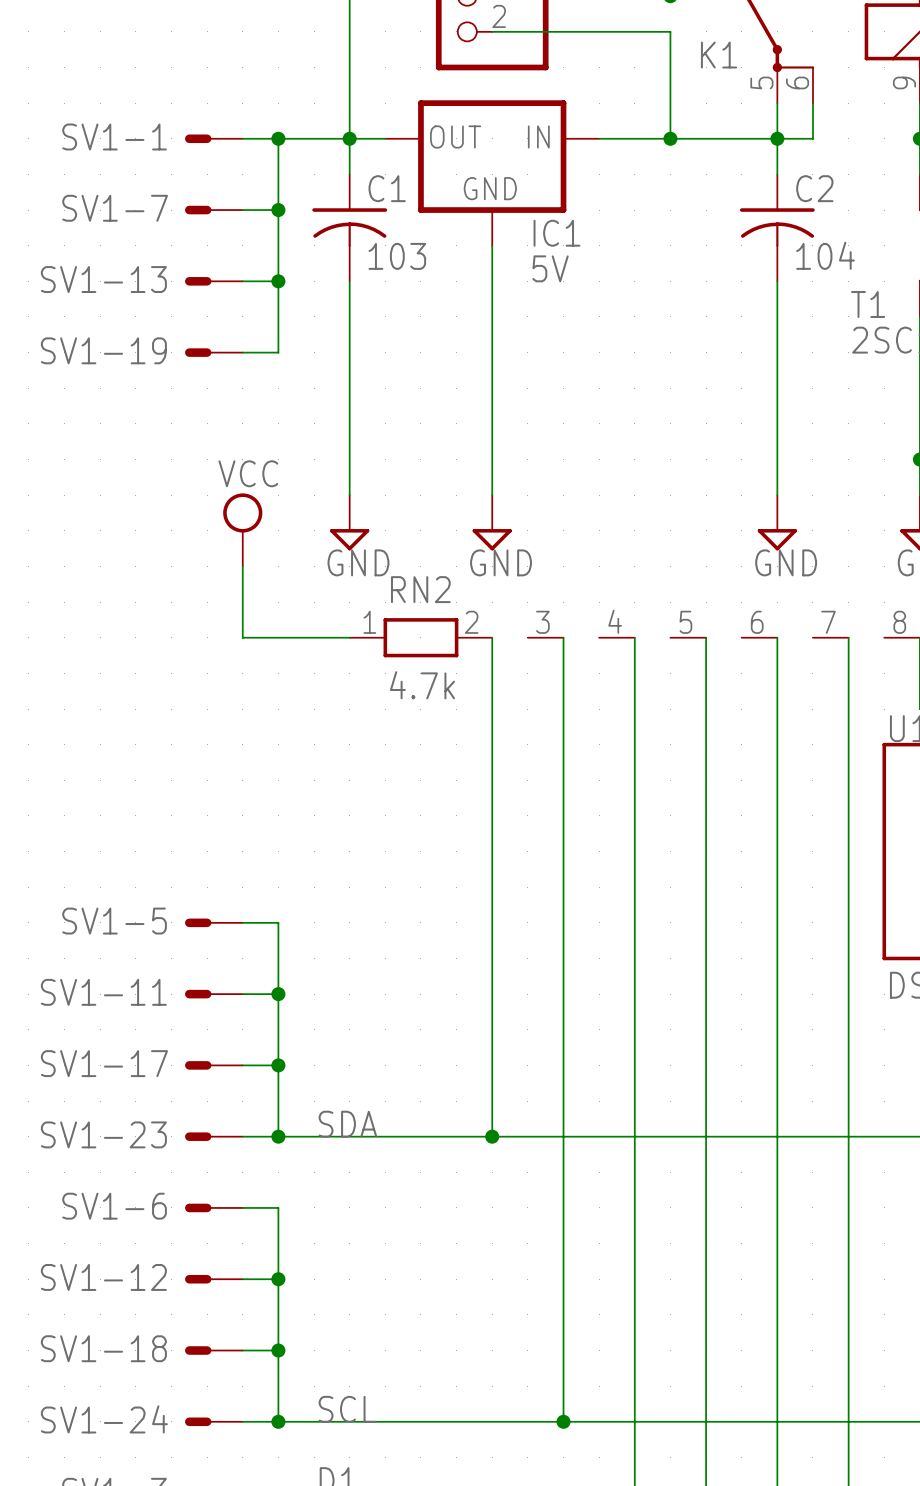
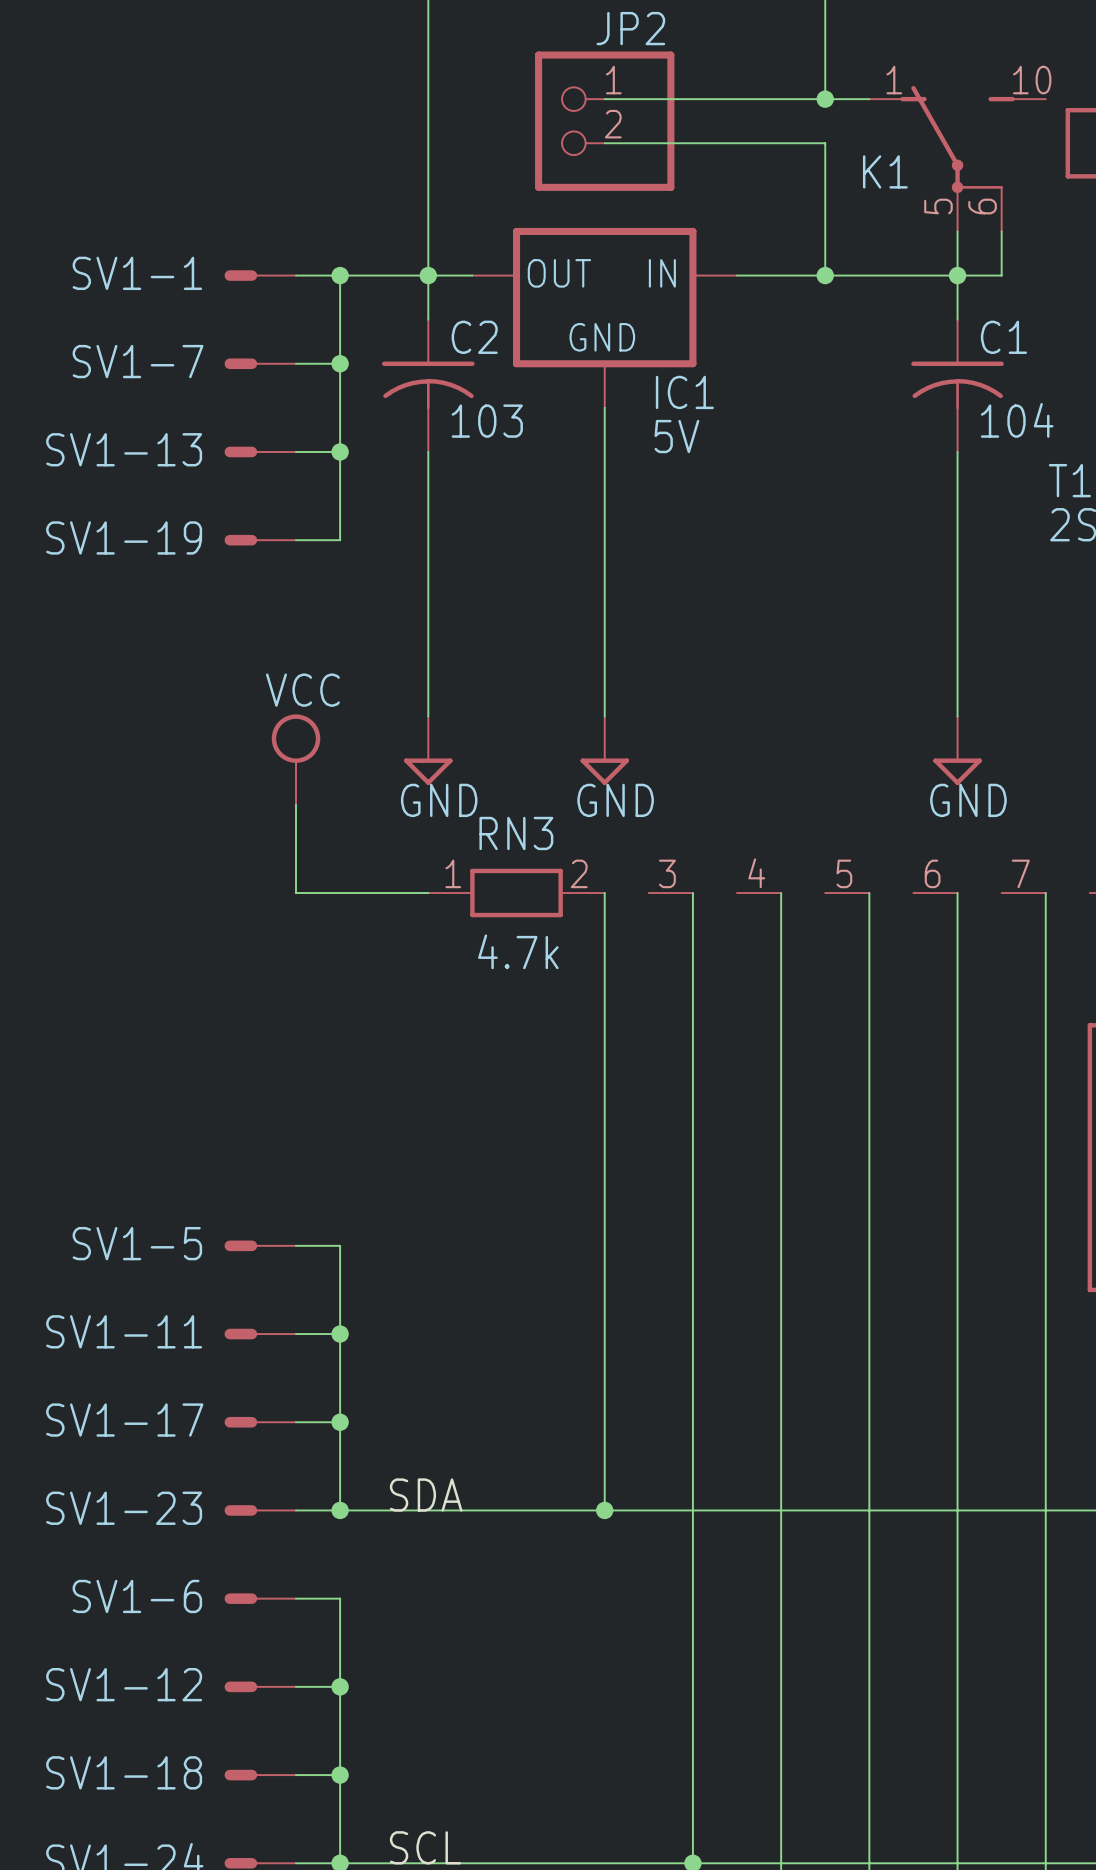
C1 name: C1 (387, 188) -> C2 (474, 337)
C2 name: C2 (814, 188) -> C1 (1003, 337)
RN2 name: RN2 (420, 589) -> RN3 (516, 833)

